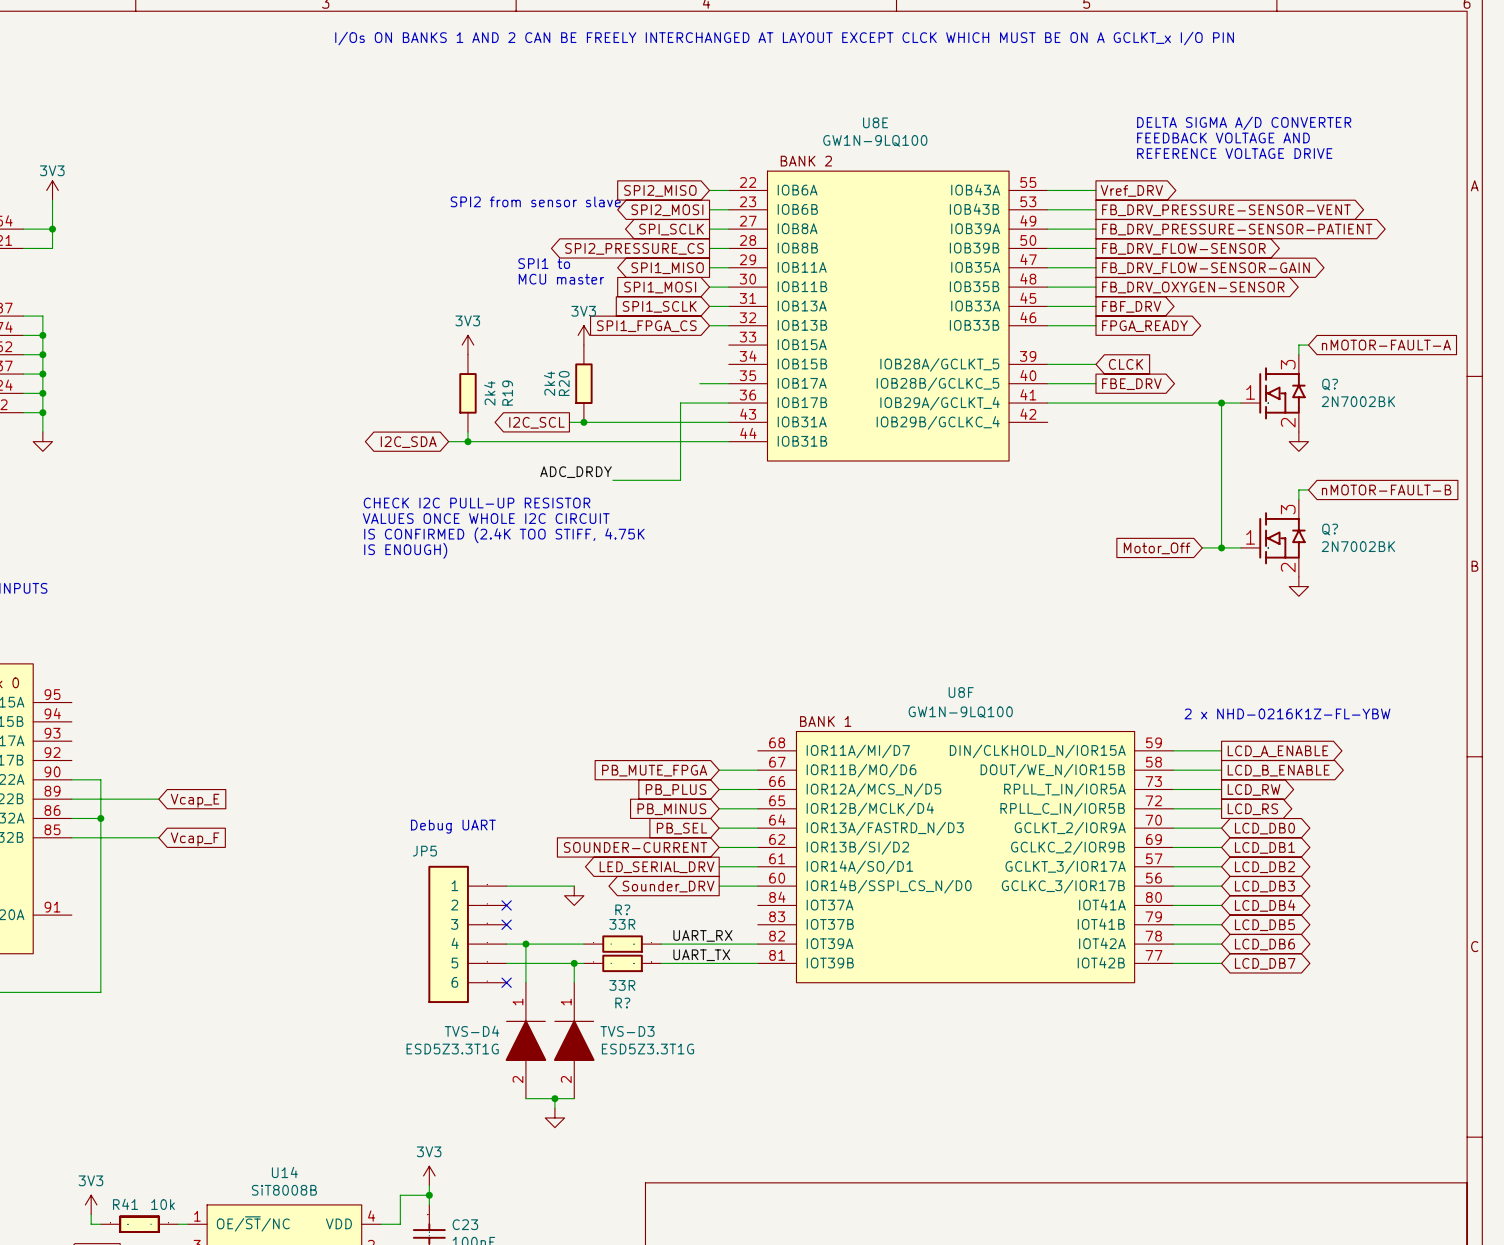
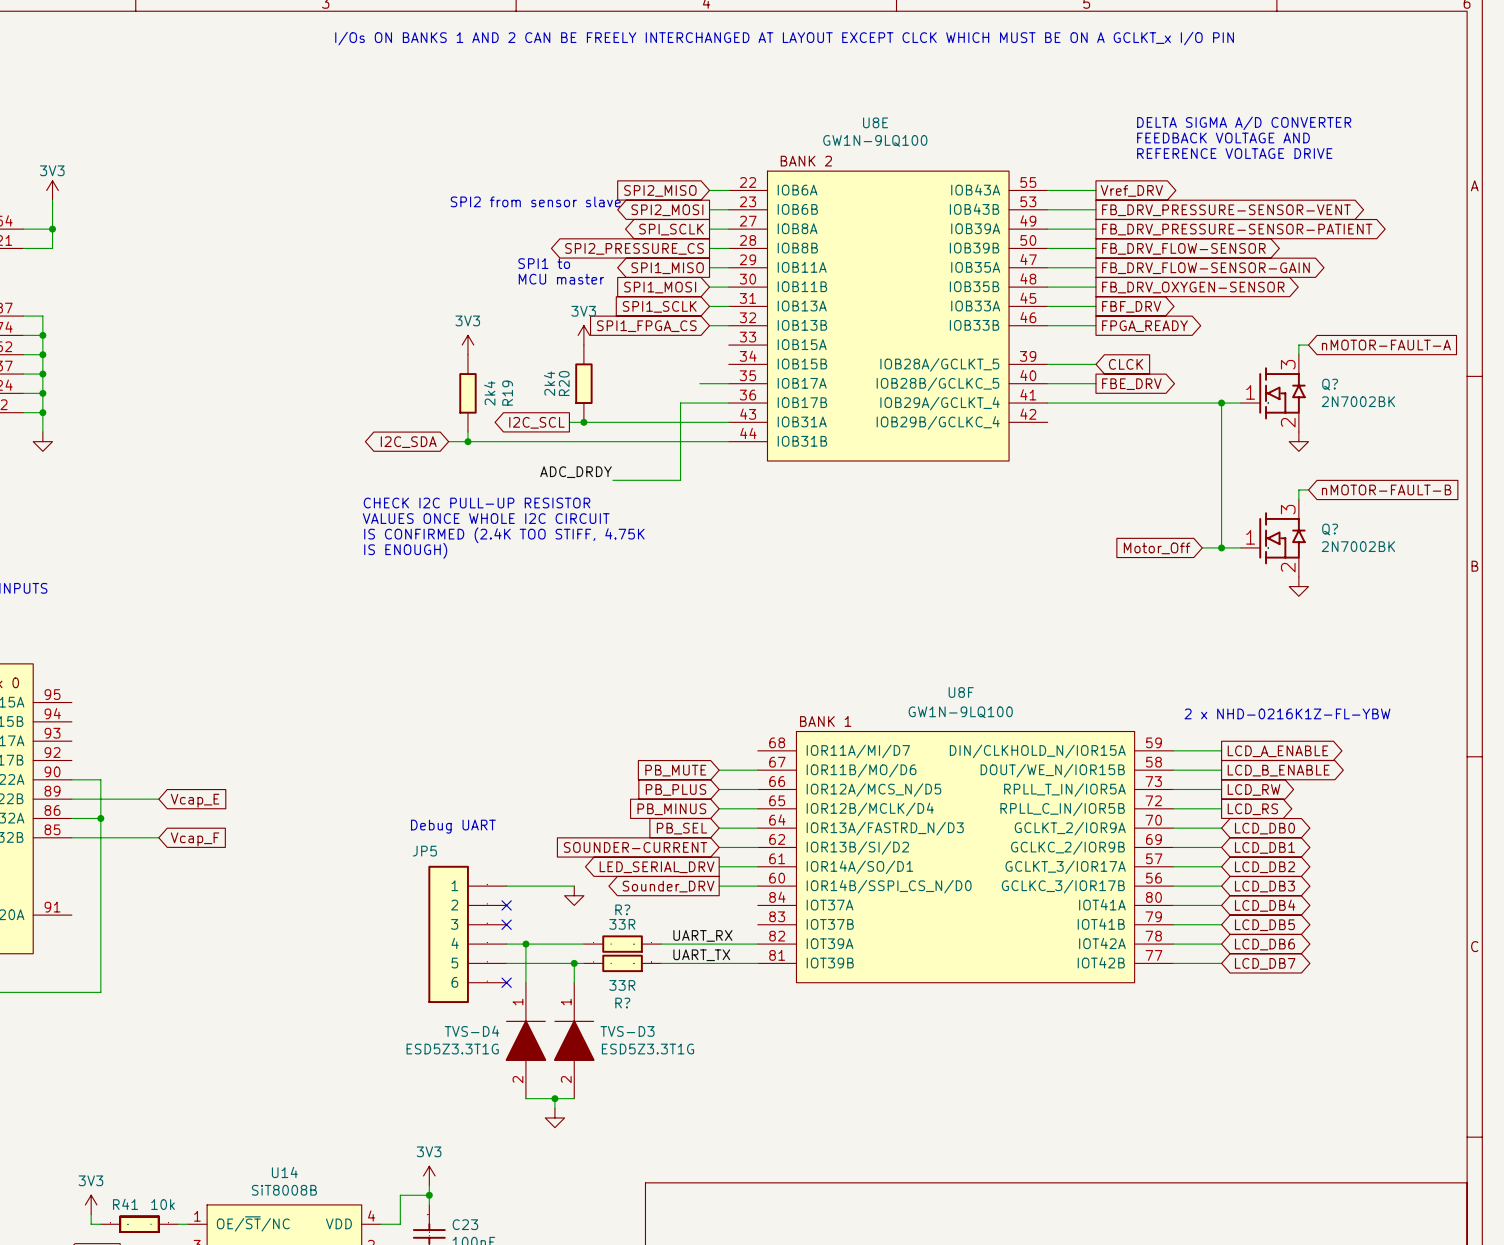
global label: PB_MUTE_FPGA (654, 770) -> PB_MUTE (675, 770)

